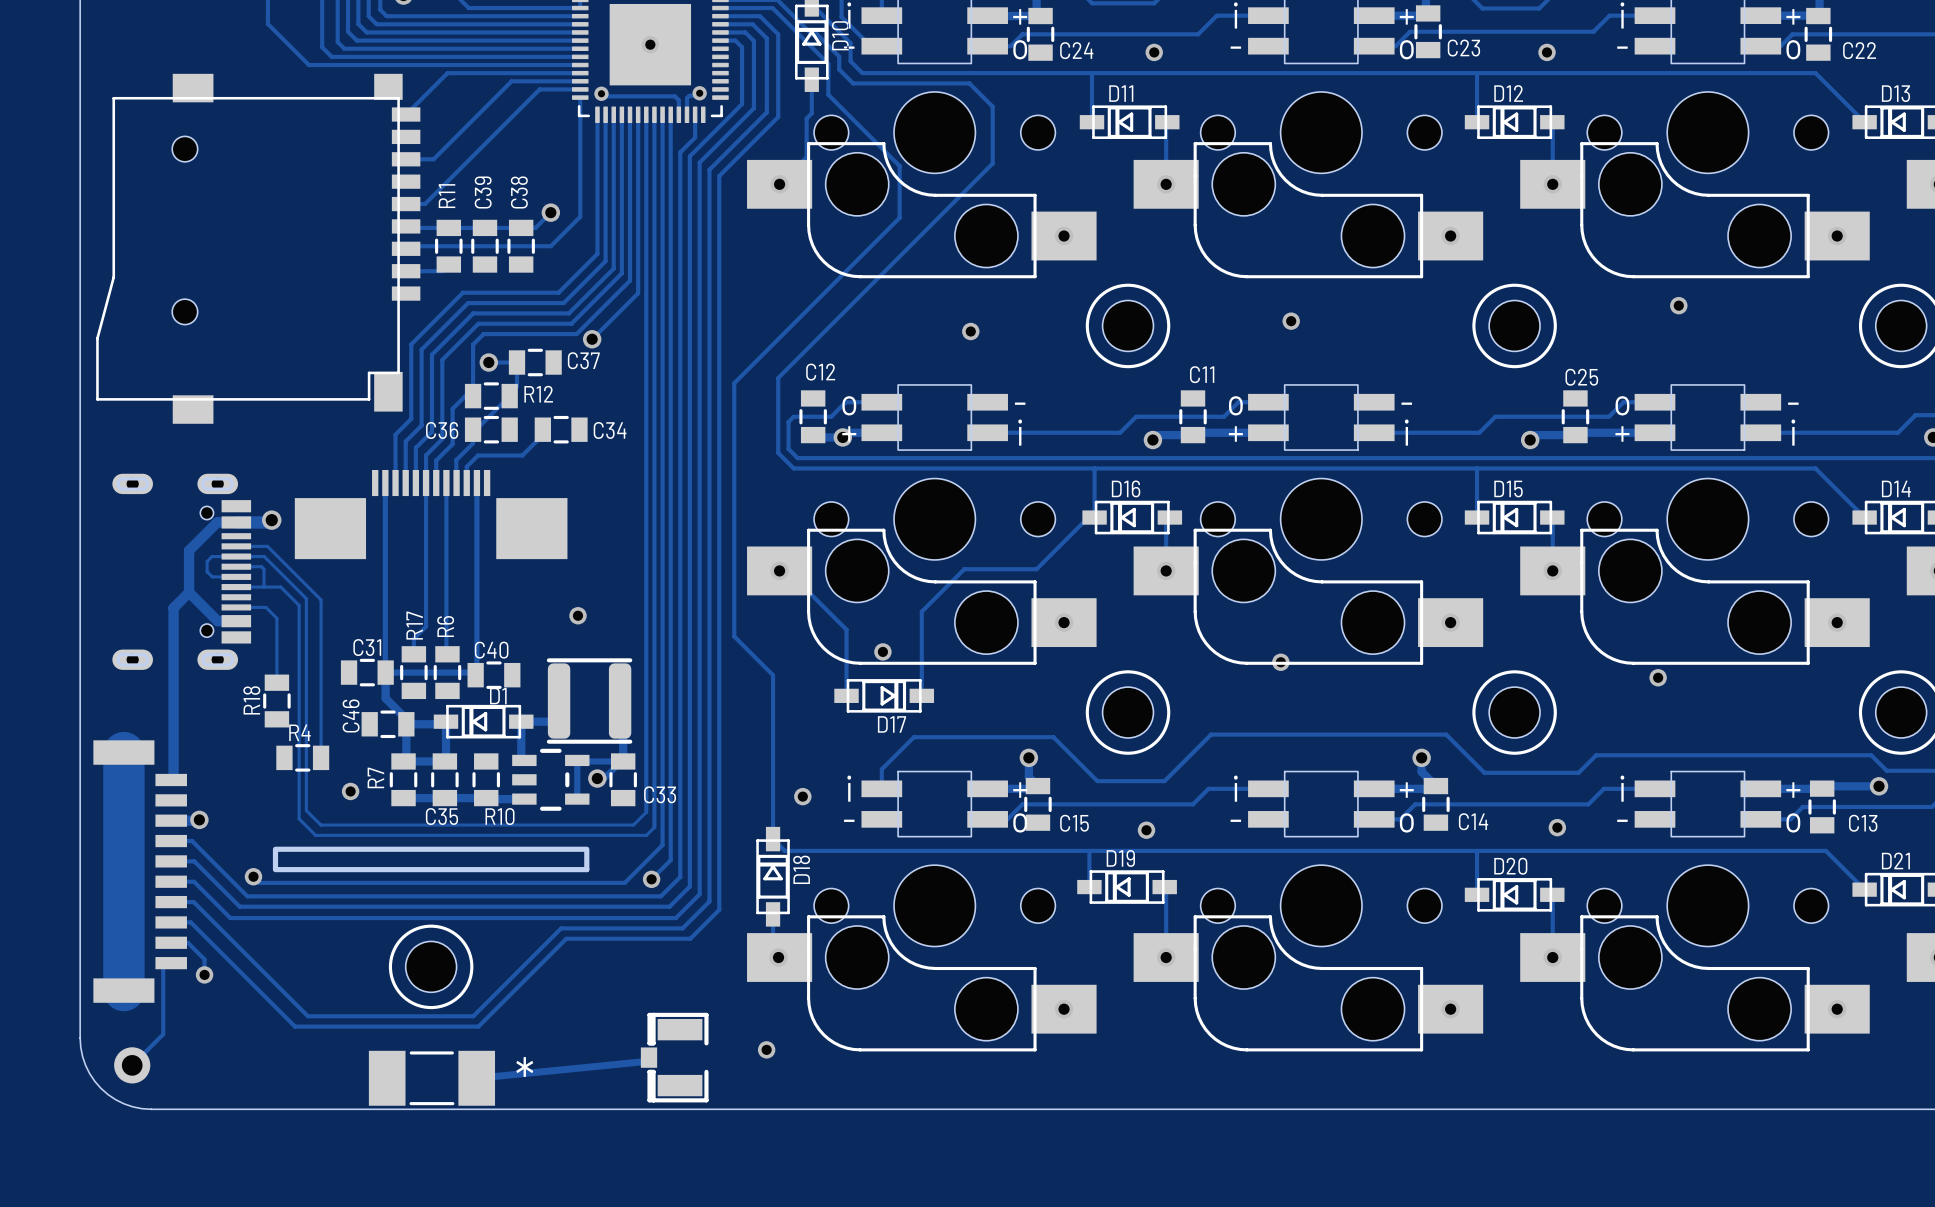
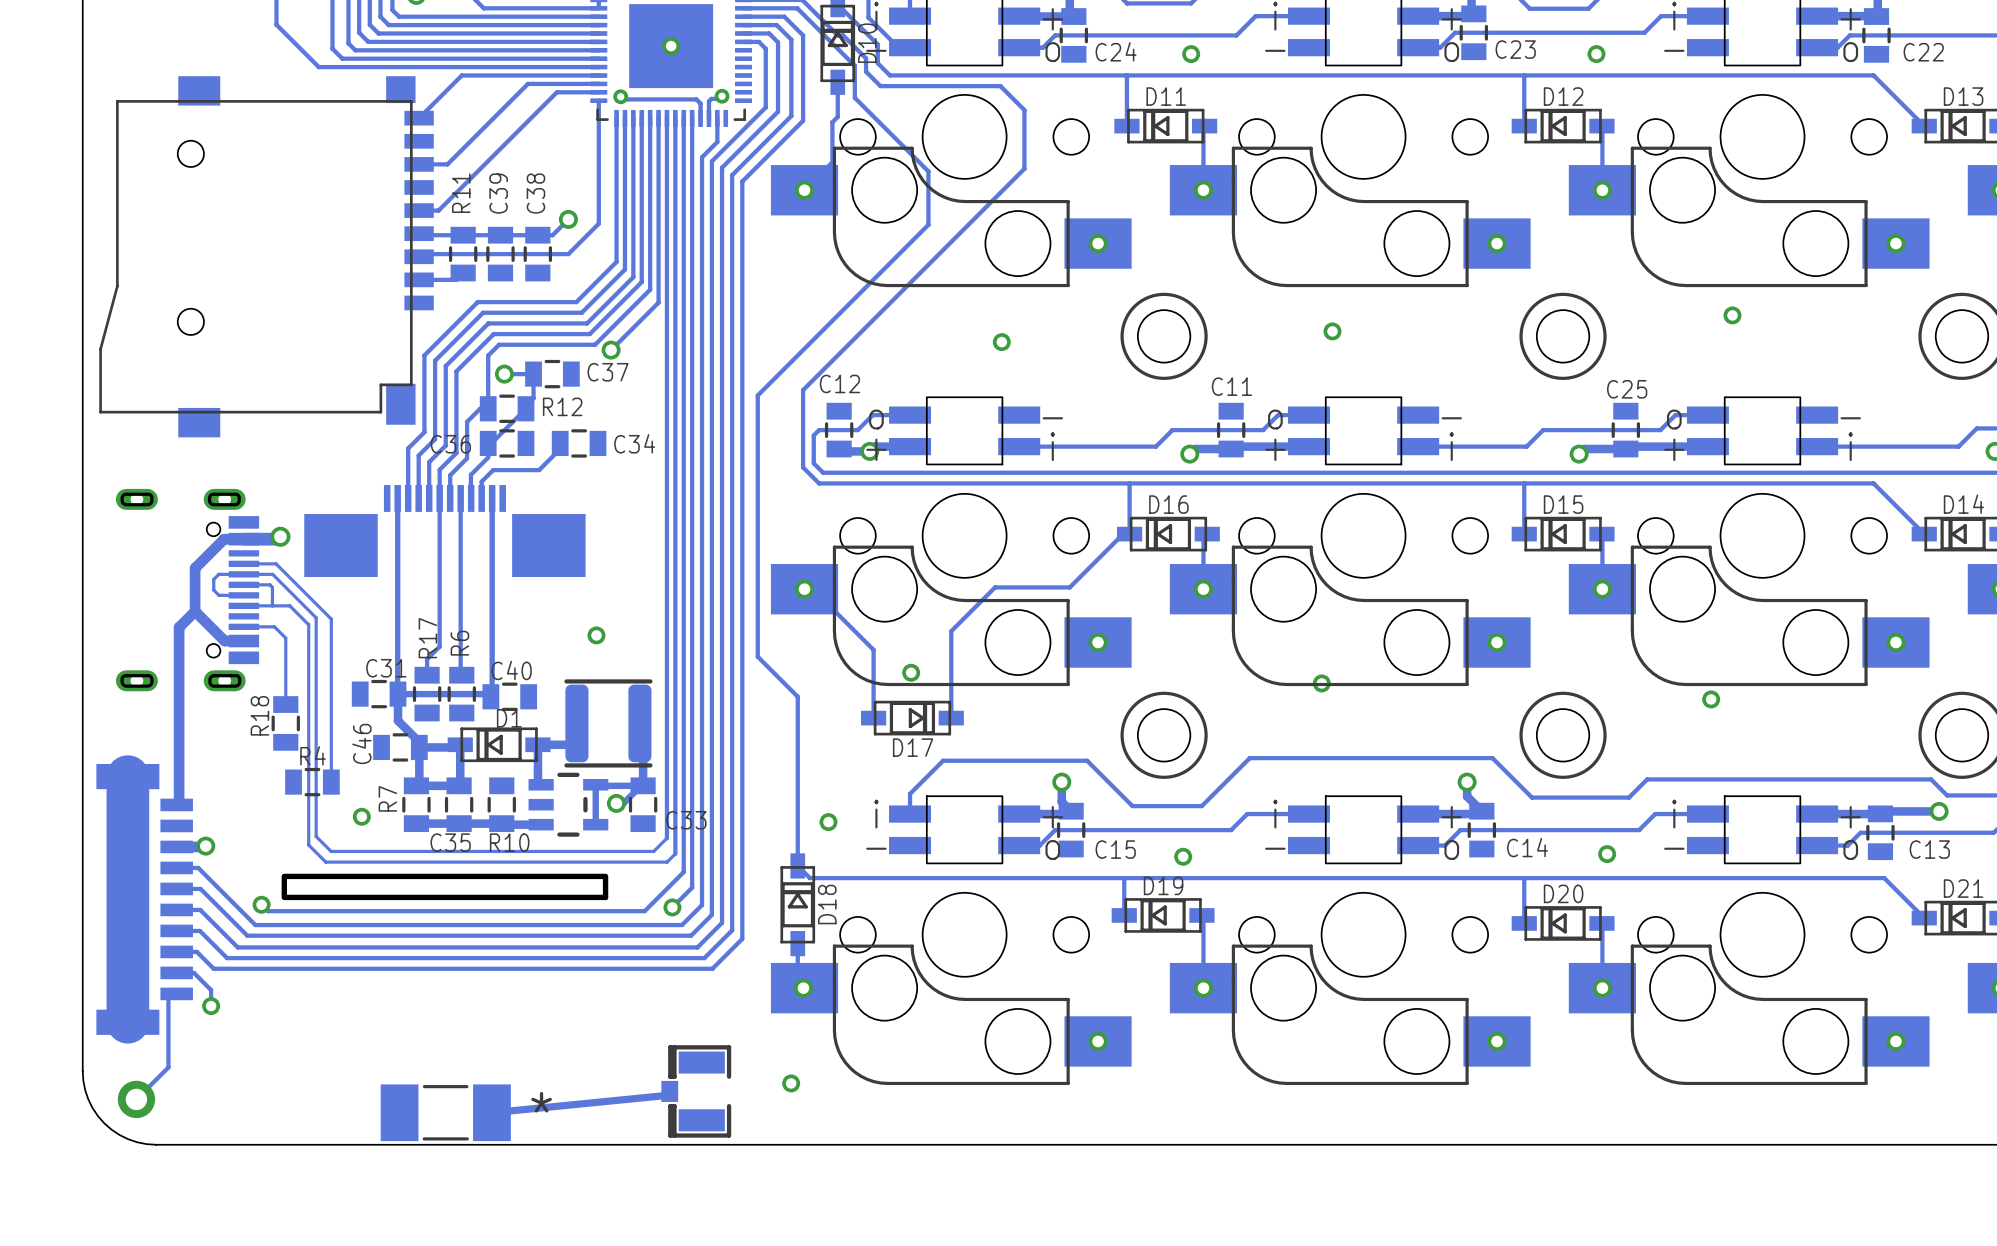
track: (561, 928) (473, 1016) (307, 1016) (220, 928) -> (579, 958) (227, 958)
track: (566, 938) (478, 1026) (295, 1026) (207, 938) -> (584, 968) (213, 968)
part: (431, 966) -> none

